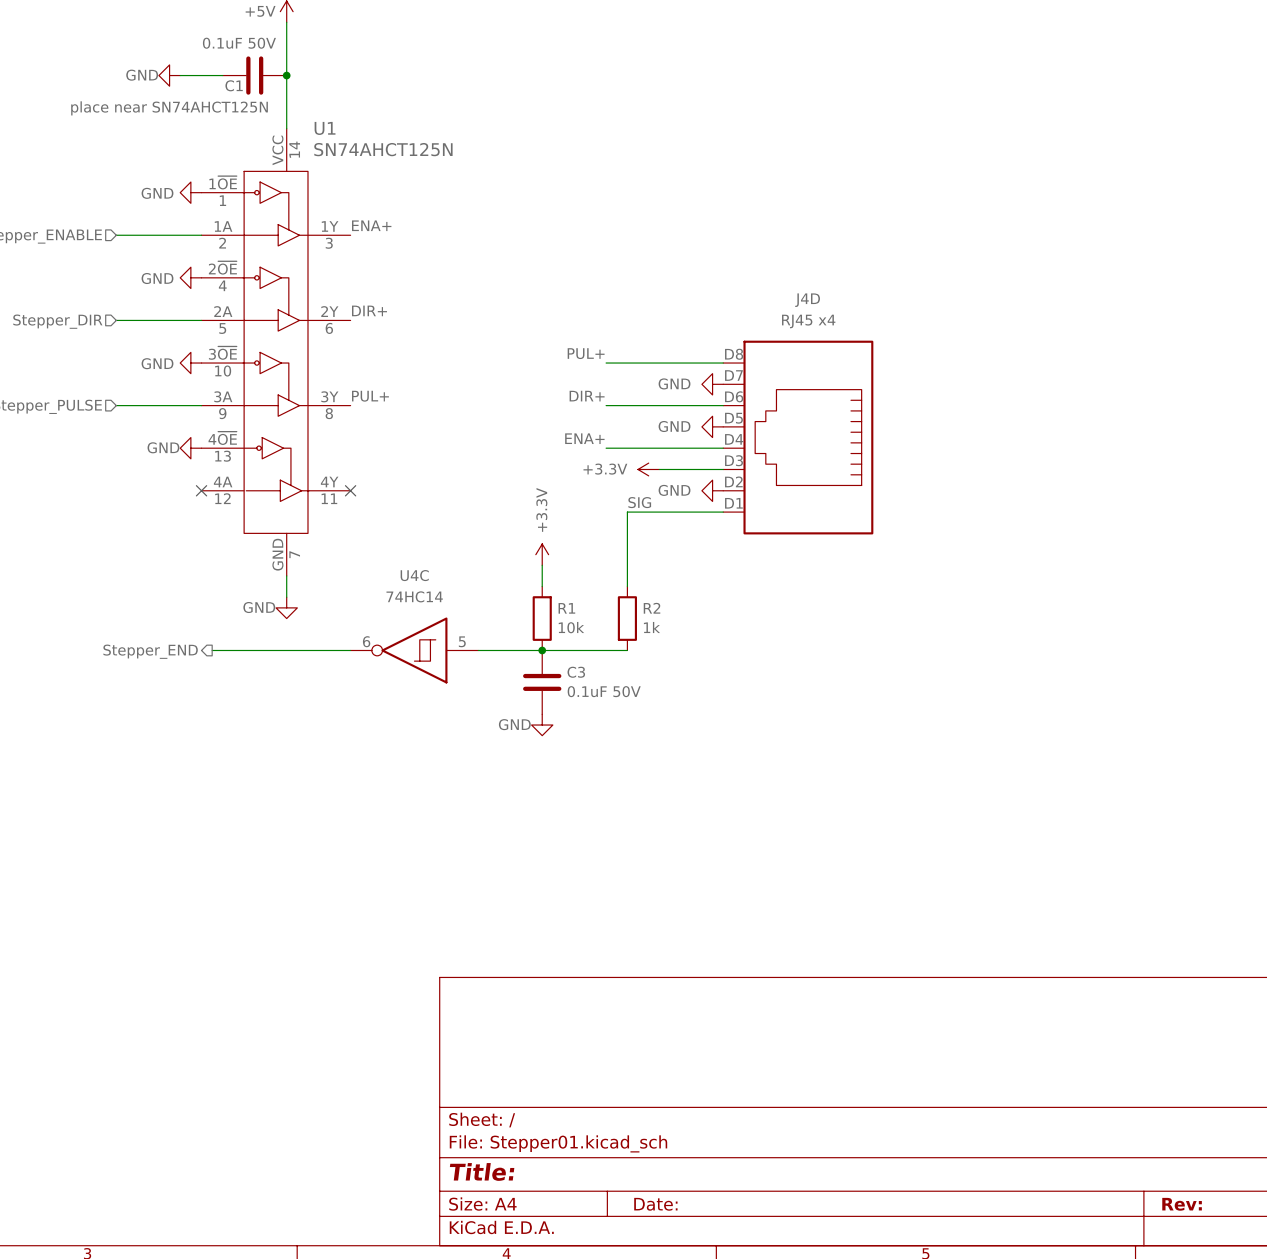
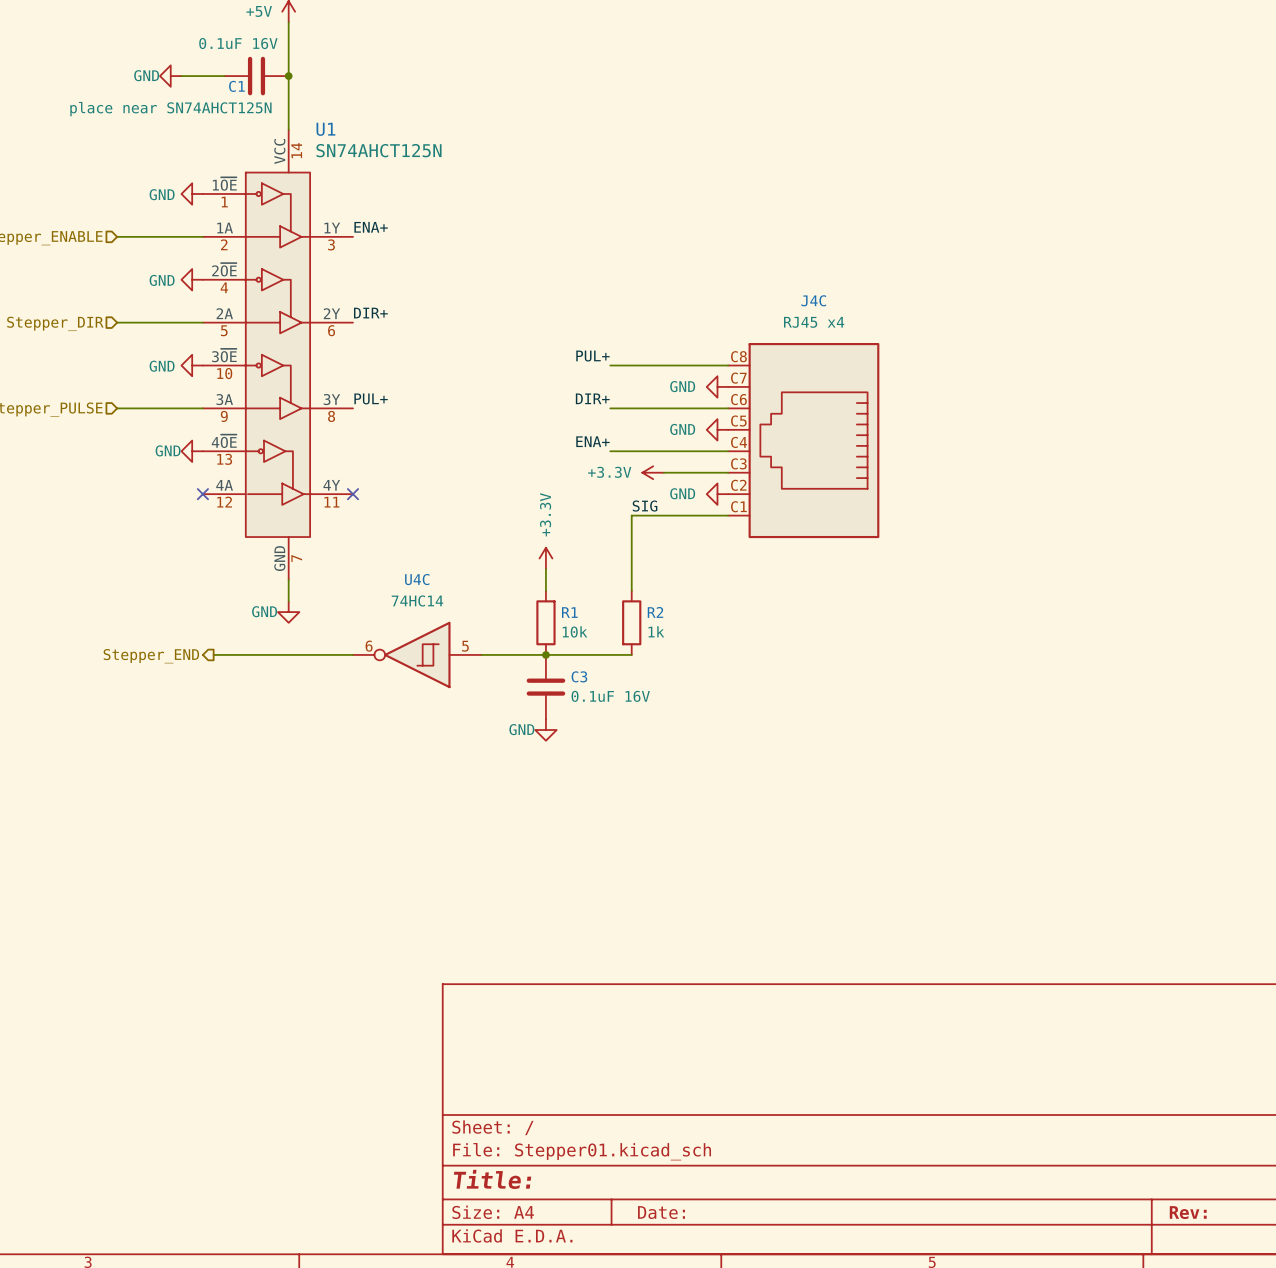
C1 value: 0.1uF 50V (239, 43) -> 0.1uF 16V (238, 43)
J4D name: J4D (807, 300) -> J4C (813, 300)
J4D pin number: D8 (734, 354) -> C8 (738, 356)
J4D pin number: D7 (733, 375) -> C7 (738, 378)
J4D pin number: D6 (734, 396) -> C6 (738, 399)
J4D pin number: D5 (733, 418) -> C5 (738, 421)
J4D pin number: D4 (734, 439) -> C4 (739, 442)
J4D pin number: D3 (734, 460) -> C3 (738, 463)
J4D pin number: D2 (733, 481) -> C2 (738, 485)
J4D pin number: D1 (733, 503) -> C1 (738, 506)
C3 value: 0.1uF 50V (604, 691) -> 0.1uF 16V (610, 696)

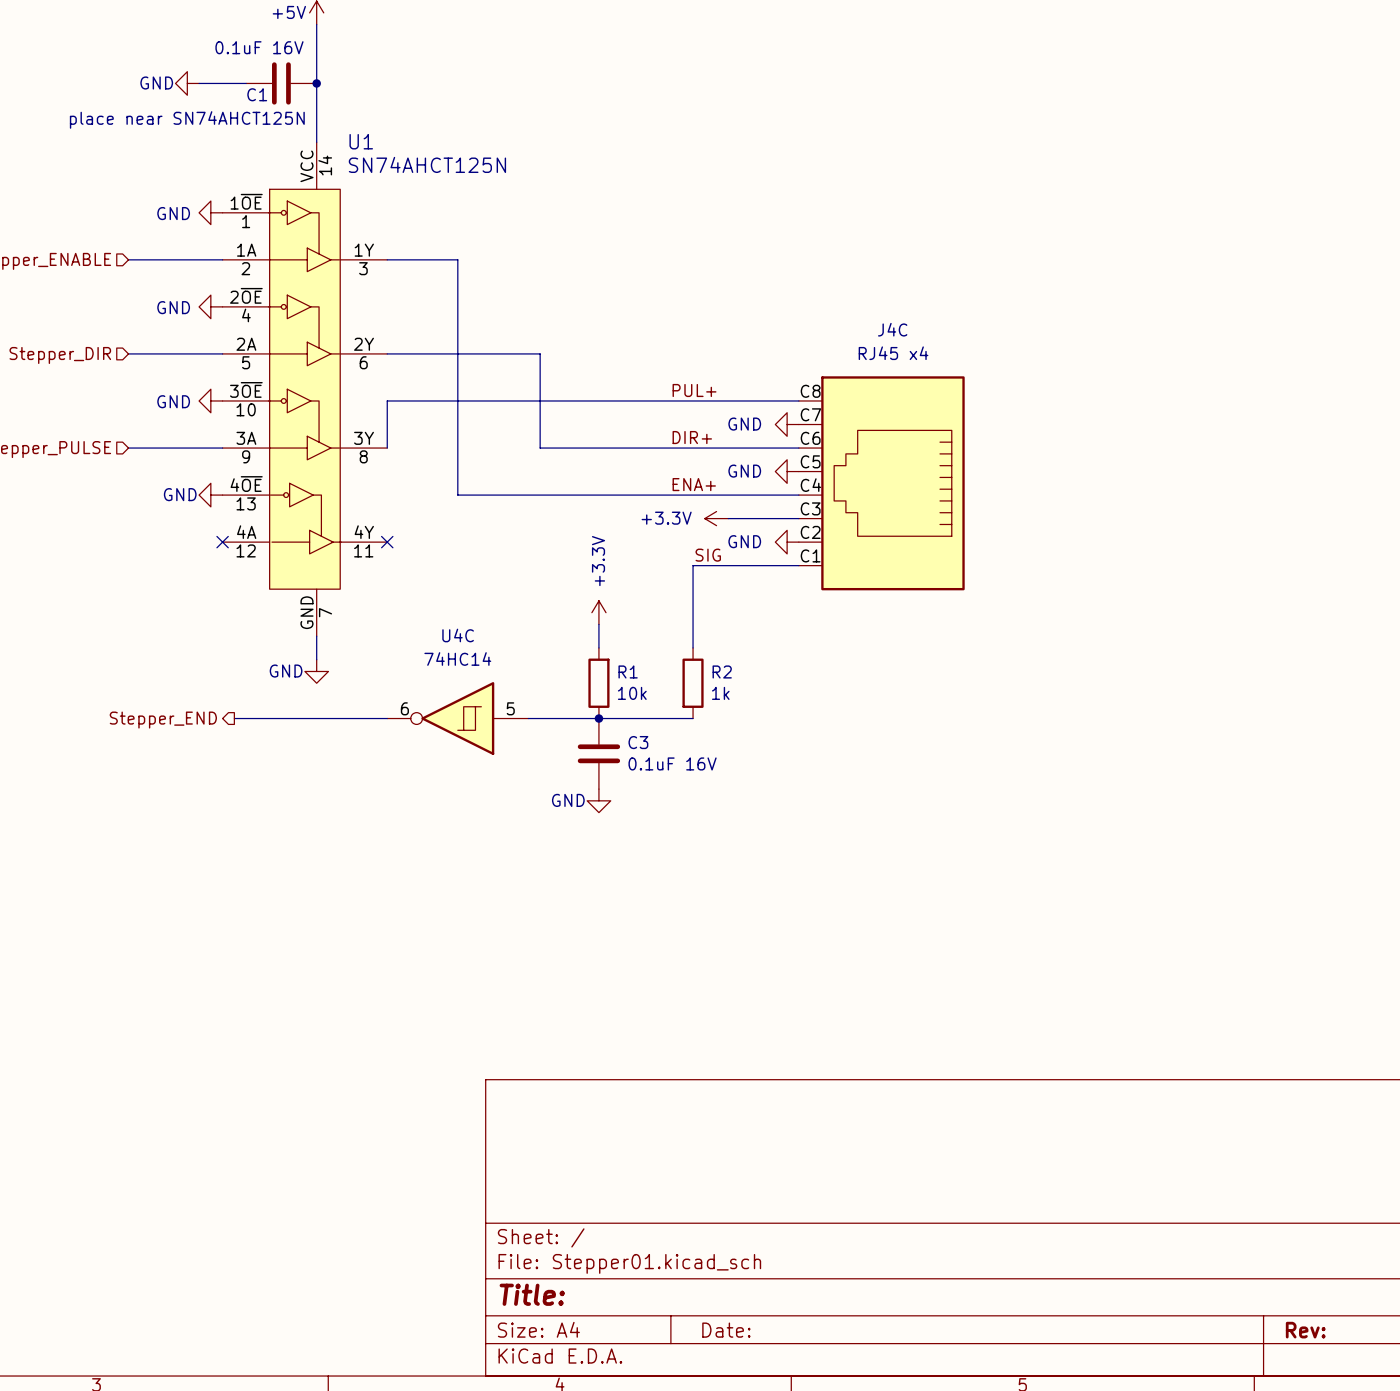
label: ENA+ (371, 227) -> none
wire: none -> (387, 259) (457, 259) (457, 495) (669, 495)
label: DIR+ (370, 313) -> none
wire: none -> (387, 353) (540, 353) (540, 448) (669, 448)
label position: PUL+ (592, 356) -> PUL+ (694, 390)
wire: none -> (669, 400) (387, 400) (387, 448)
label: PUL+ (371, 398) -> none
label position: DIR+ (592, 398) -> DIR+ (692, 437)
label position: ENA+ (592, 441) -> ENA+ (694, 484)

